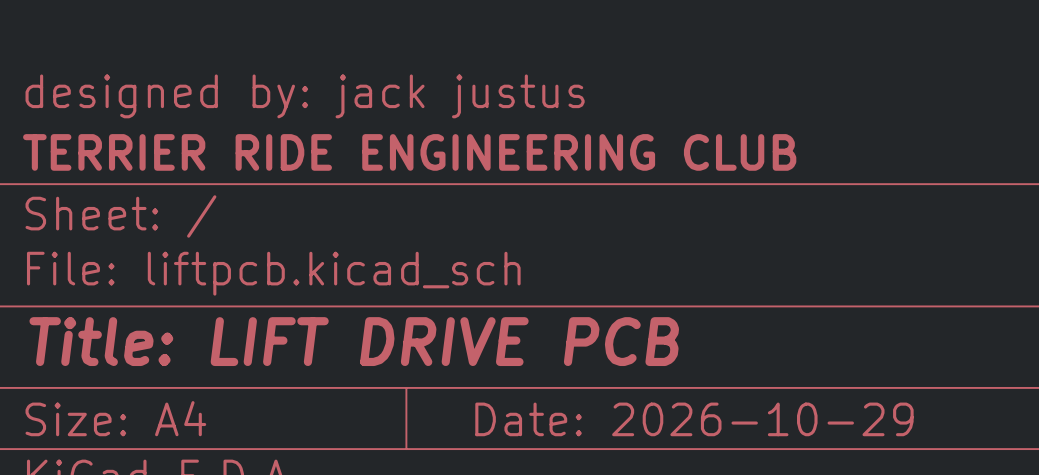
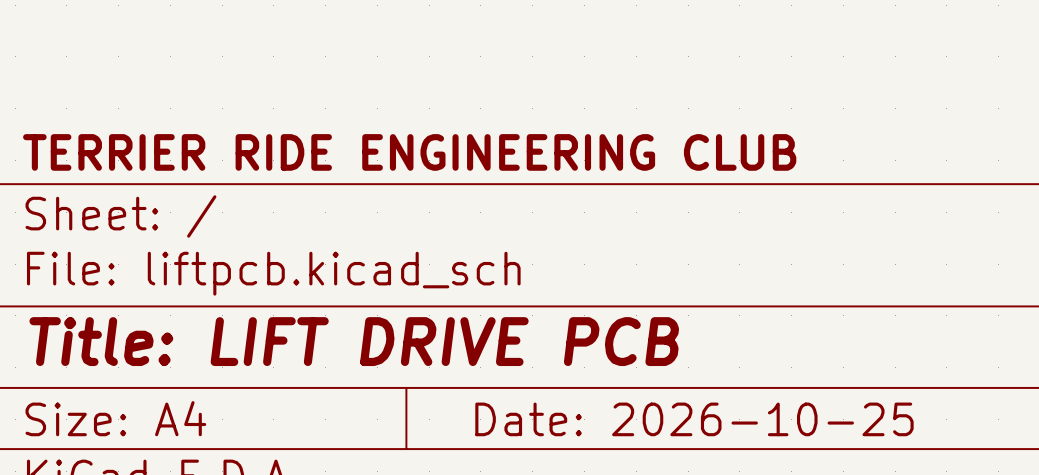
title block: designed by: jack justus (305, 96) -> none
title block: Date: 2026-10-29 (694, 419) -> Date: 2026-10-25 (694, 419)

